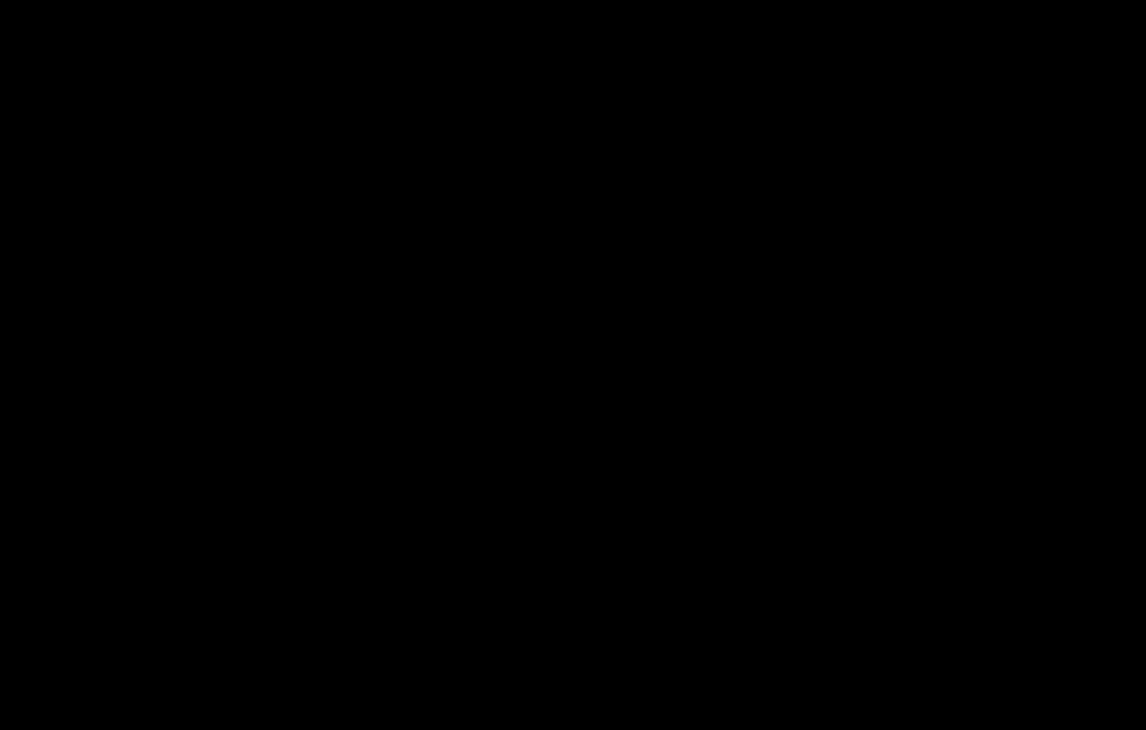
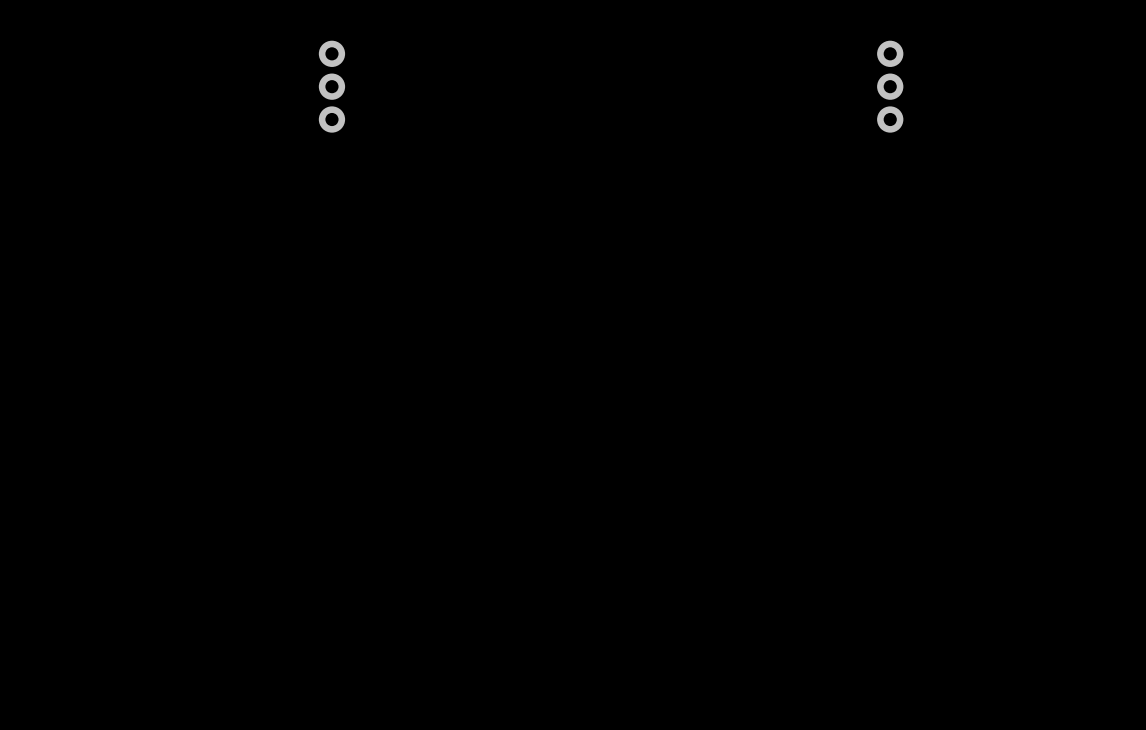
via: none -> (331, 53)
via: none -> (890, 53)
via: none -> (331, 86)
via: none -> (890, 86)
via: none -> (331, 119)
via: none -> (890, 119)

